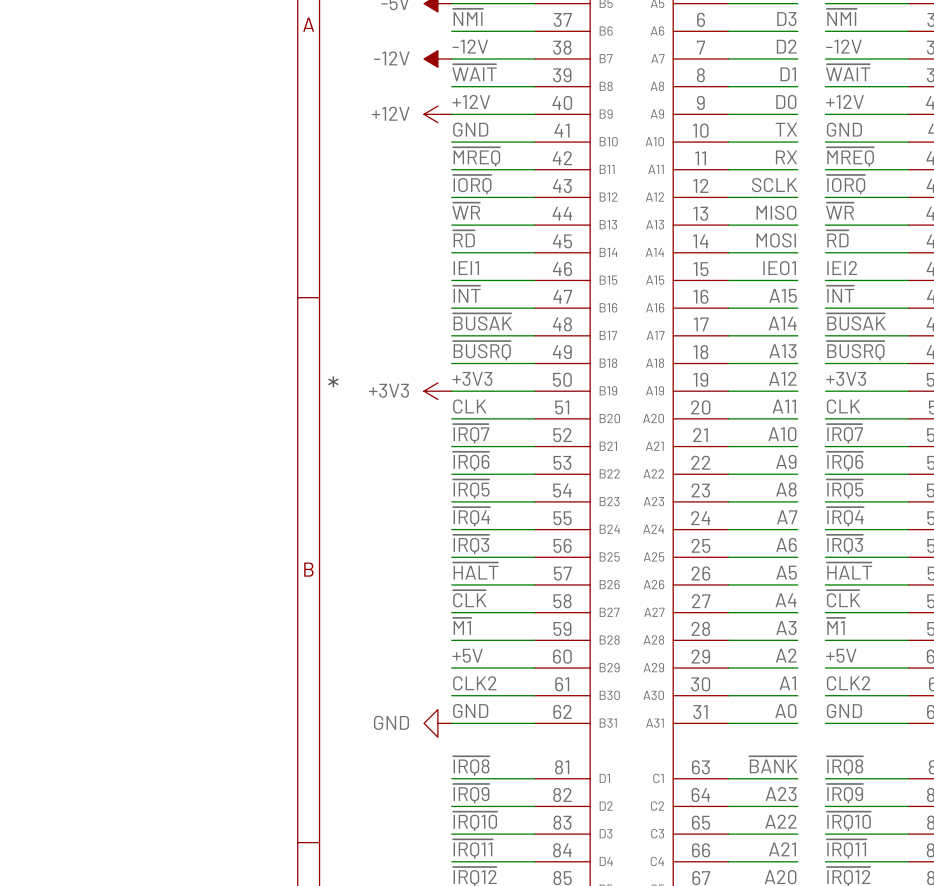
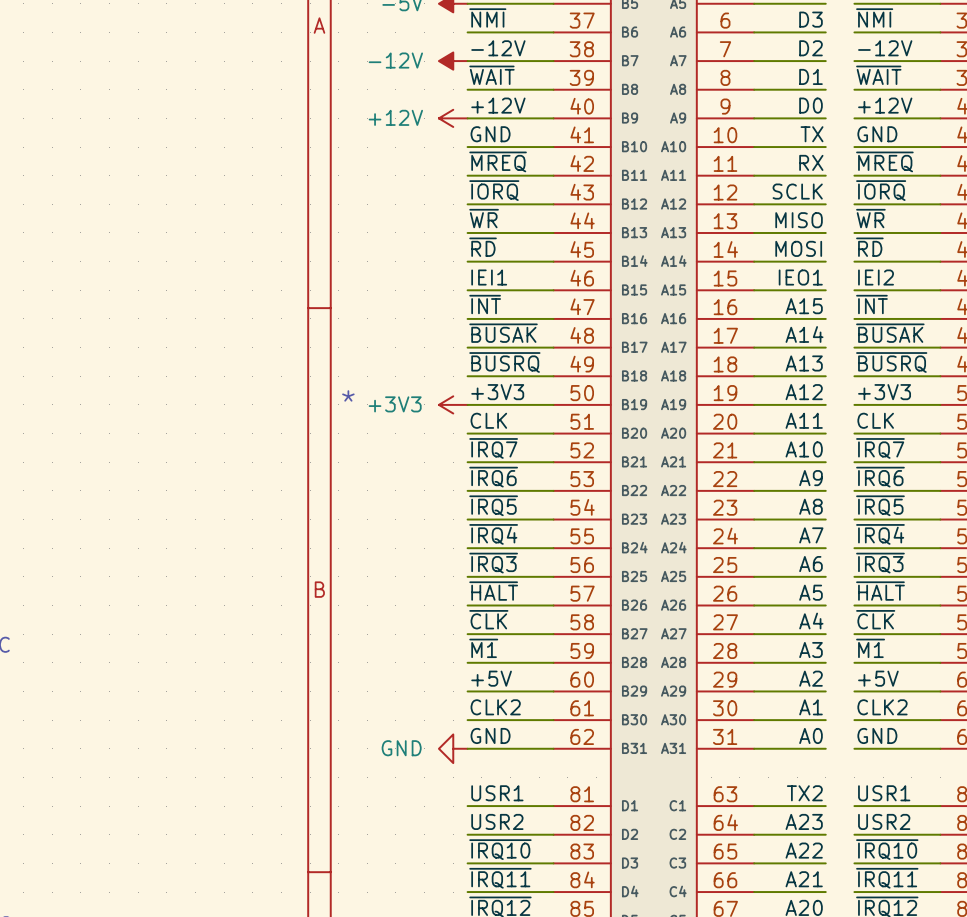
label: ~{BANK} (773, 764) -> TX2 (804, 793)
label: ~{IRQ8} (471, 765) -> USR1 (497, 793)
label: ~{IRQ8} (845, 765) -> USR1 (884, 793)
label: ~{IRQ9} (471, 793) -> USR2 (497, 821)
label: ~{IRQ9} (844, 793) -> USR2 (884, 821)

